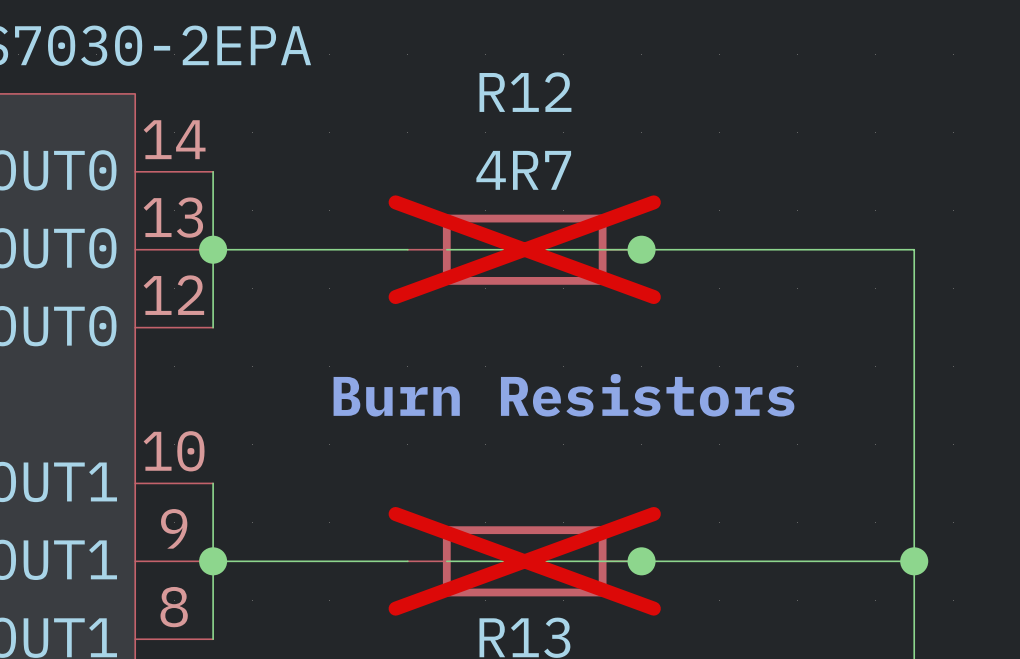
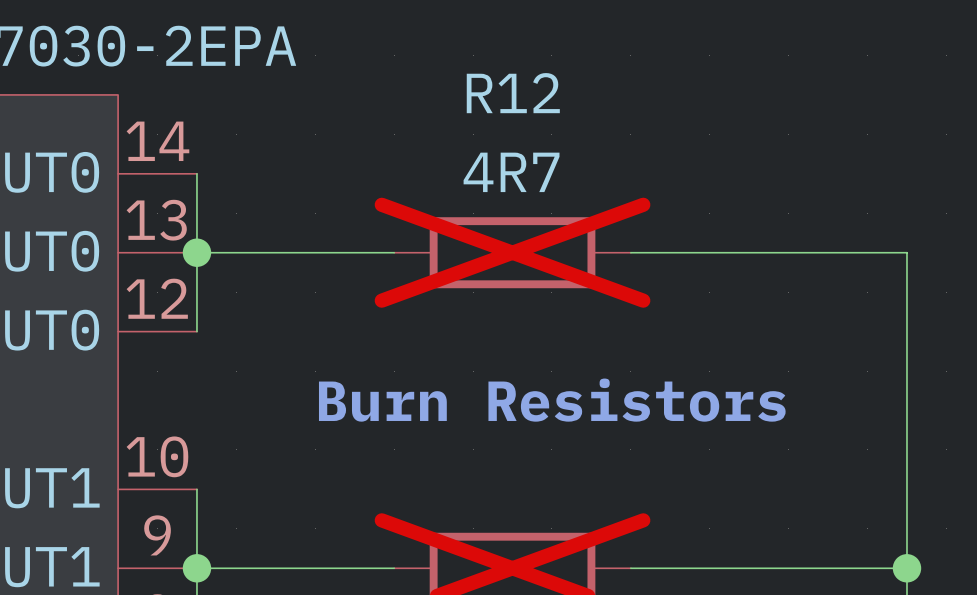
wire: (446, 249) (641, 249) -> none
junction: (641, 249) -> none
wire: (446, 561) (641, 561) -> none
junction: (641, 561) -> none

